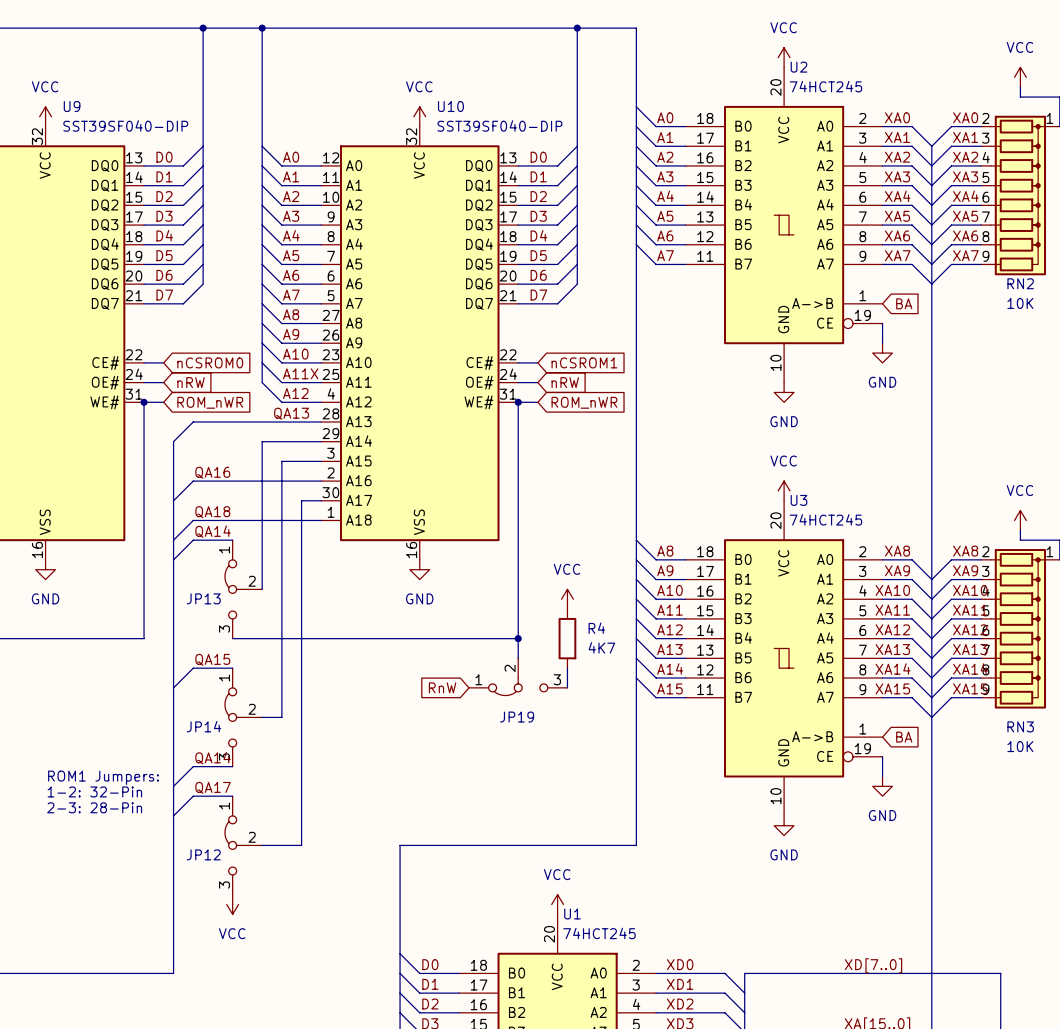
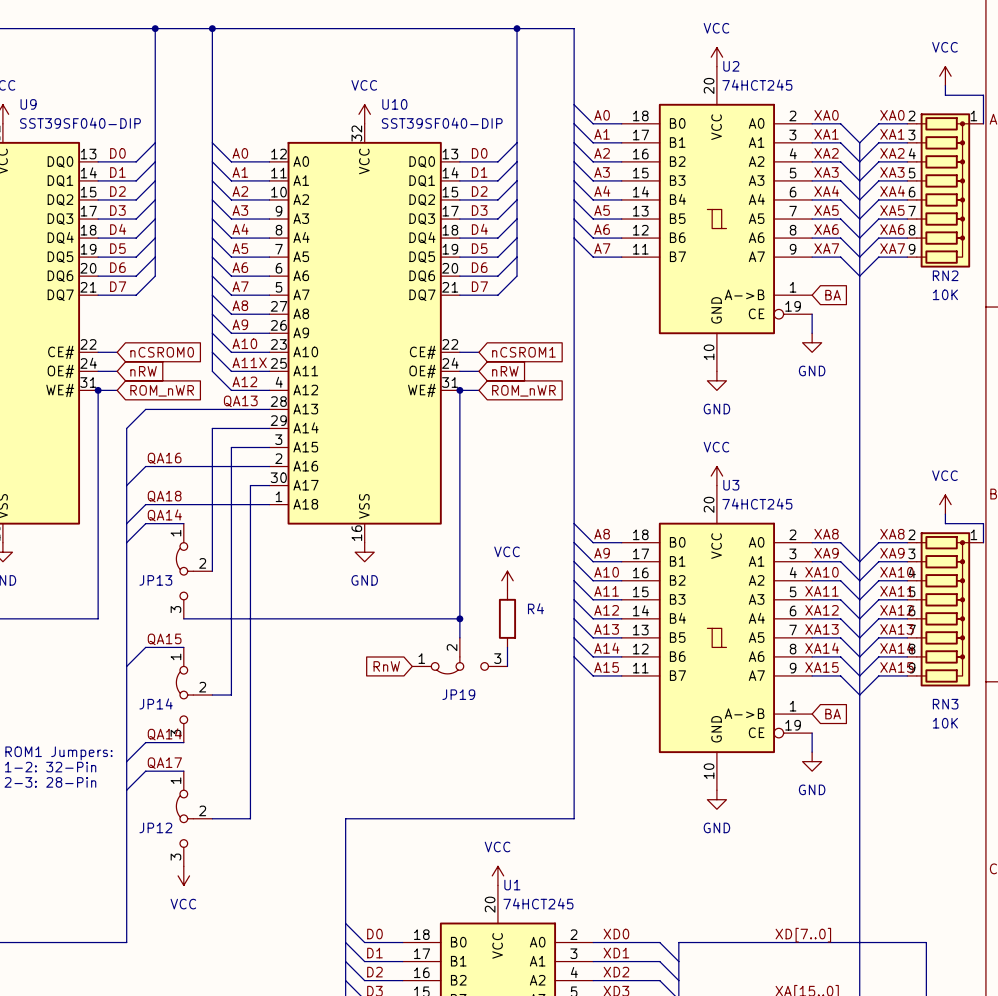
R4 value: 4K7 (601, 647) -> none

